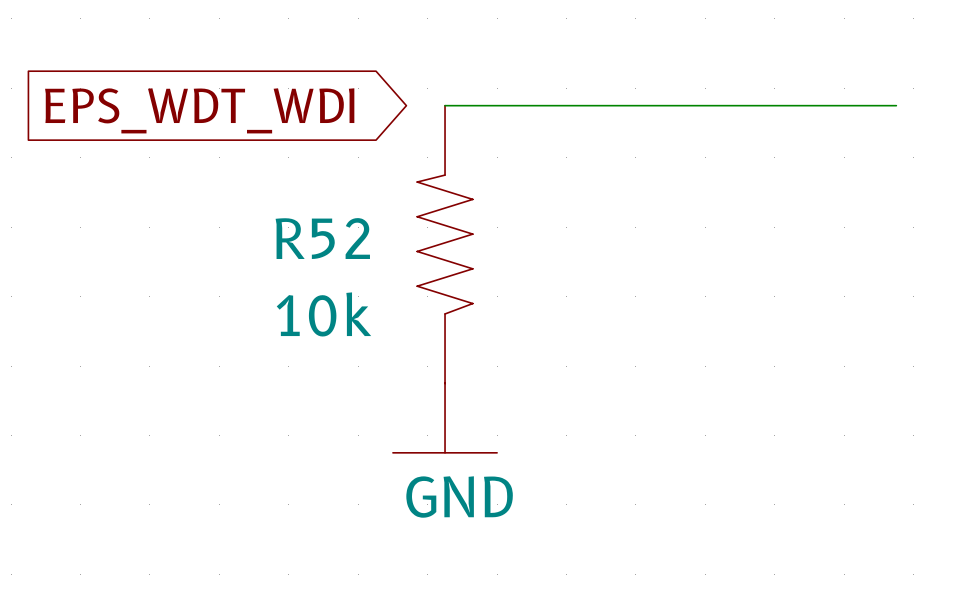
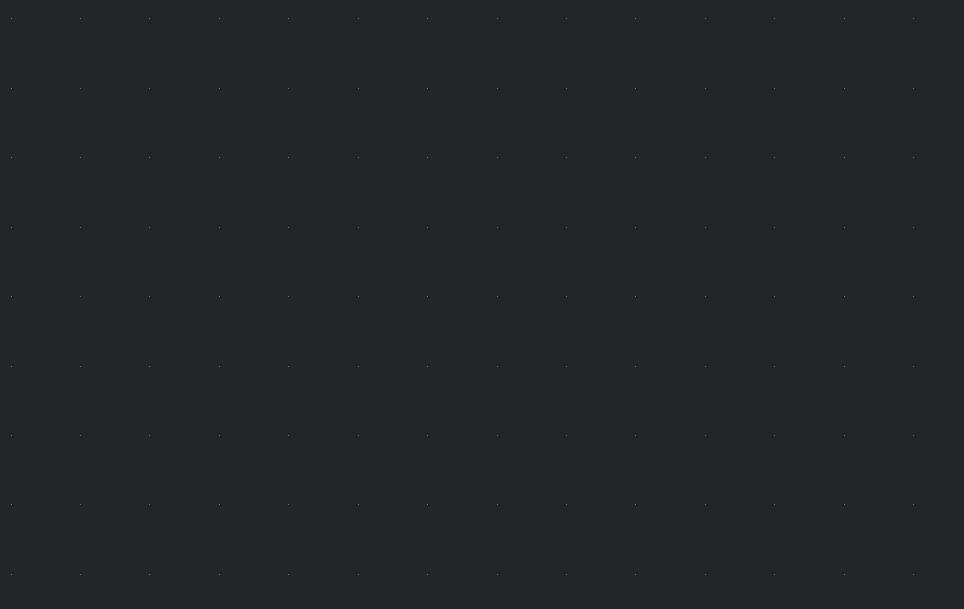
wire: (445, 105) (896, 105) -> none
global label: EPS_WDT_WDI (199, 110) -> none
R52: 10k (445, 244) -> none
power symbol: GND (445, 418) -> none

